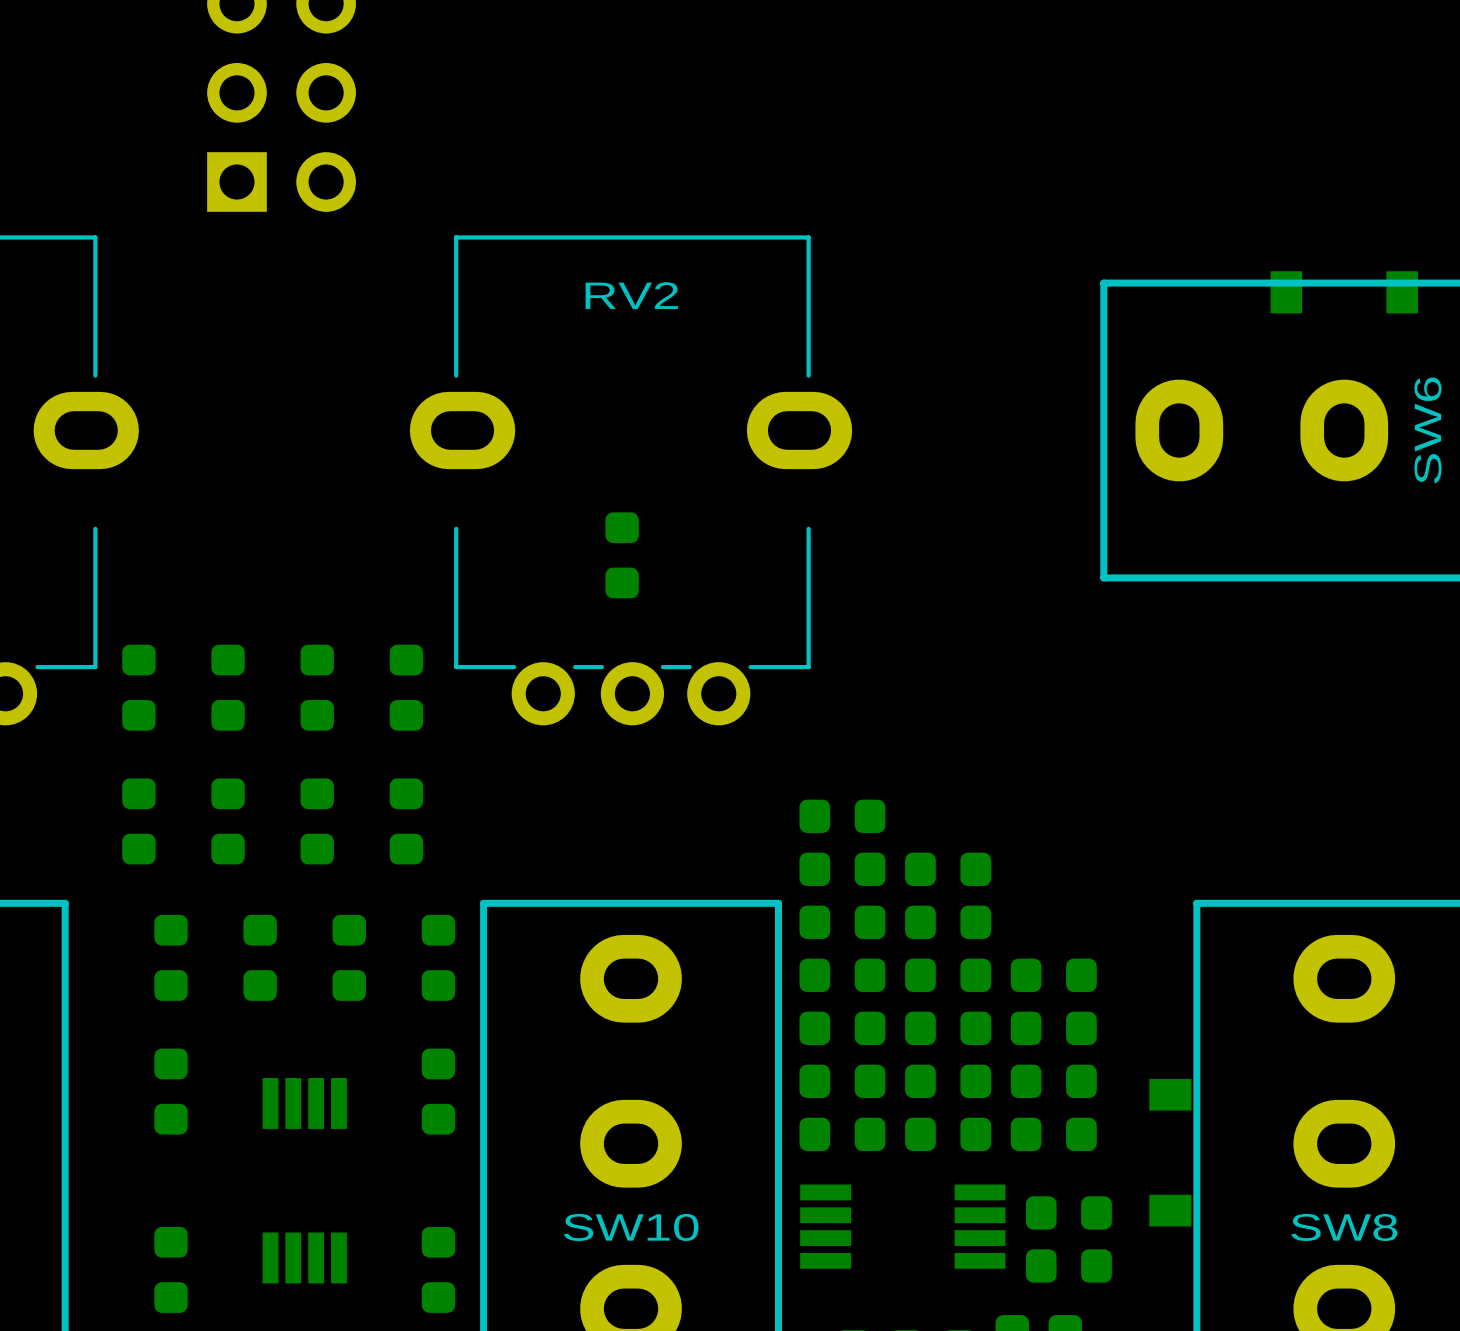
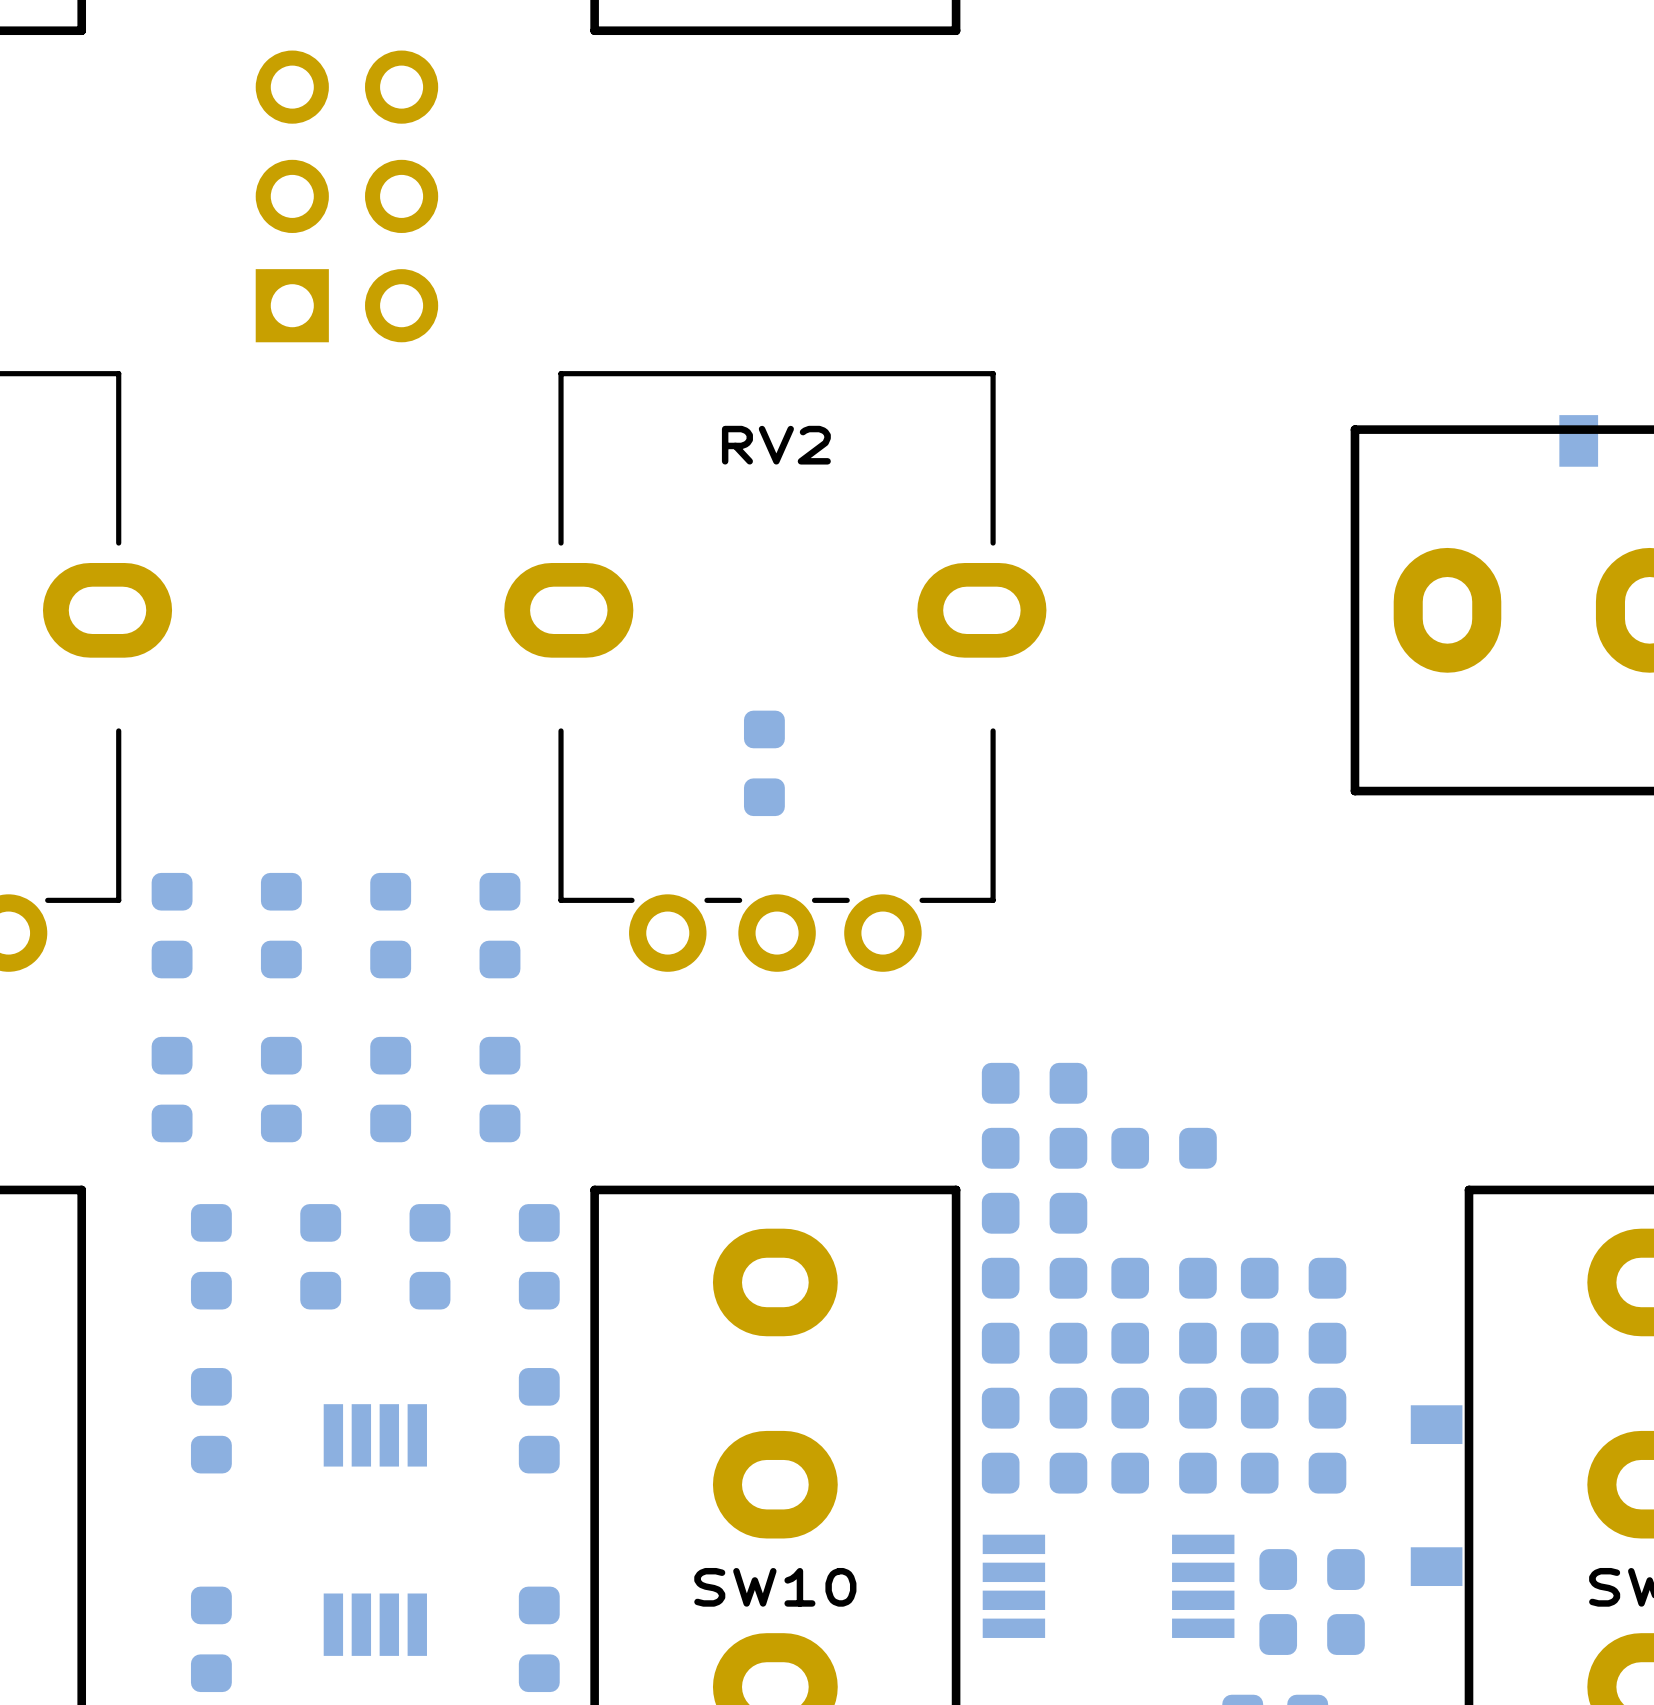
part: (948, 922) -> none

